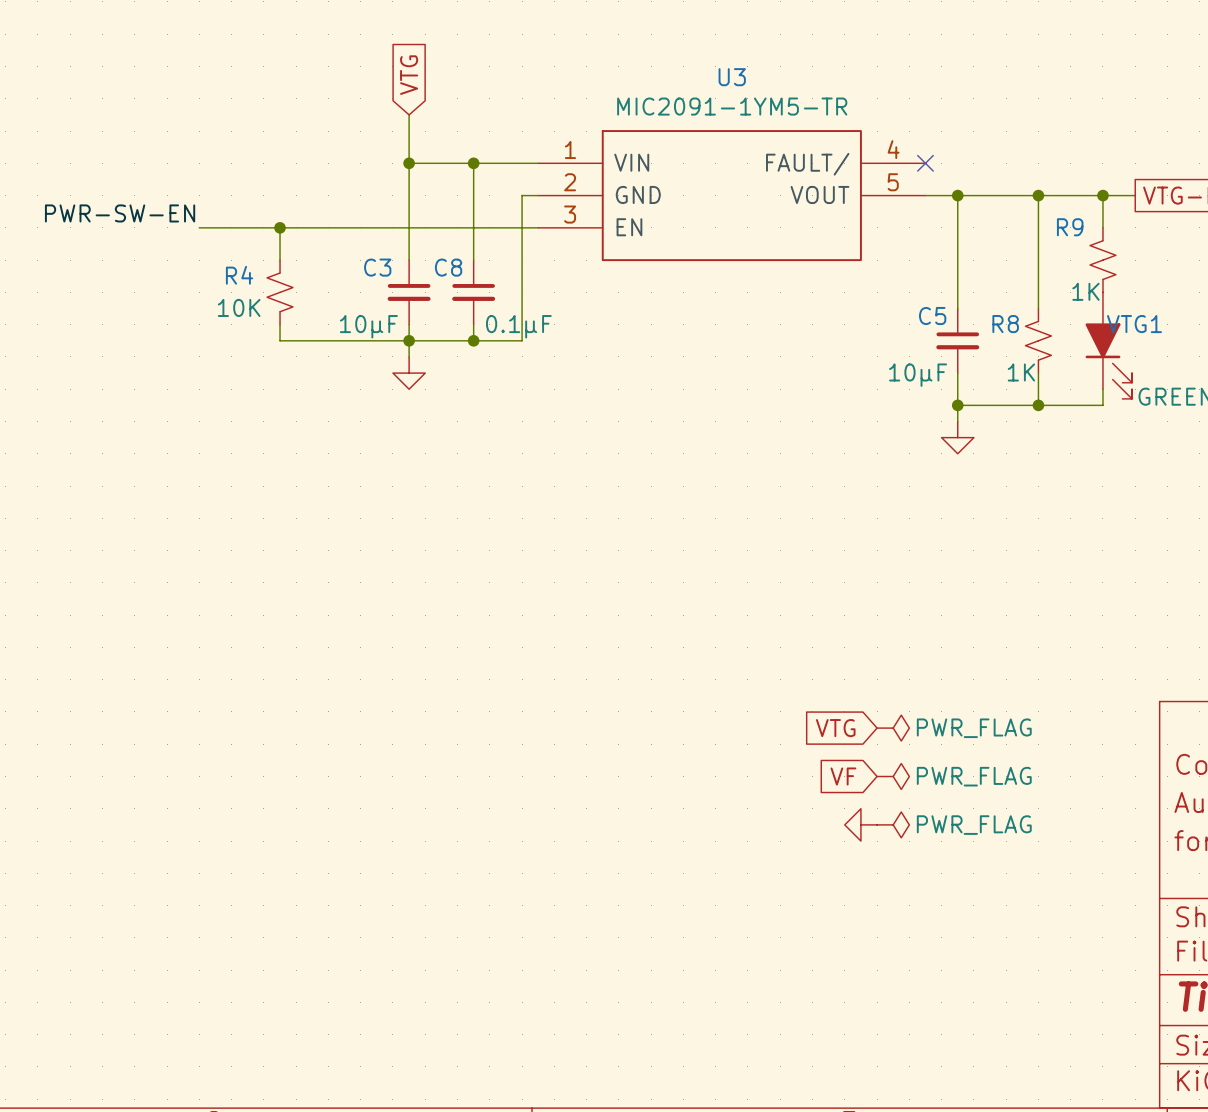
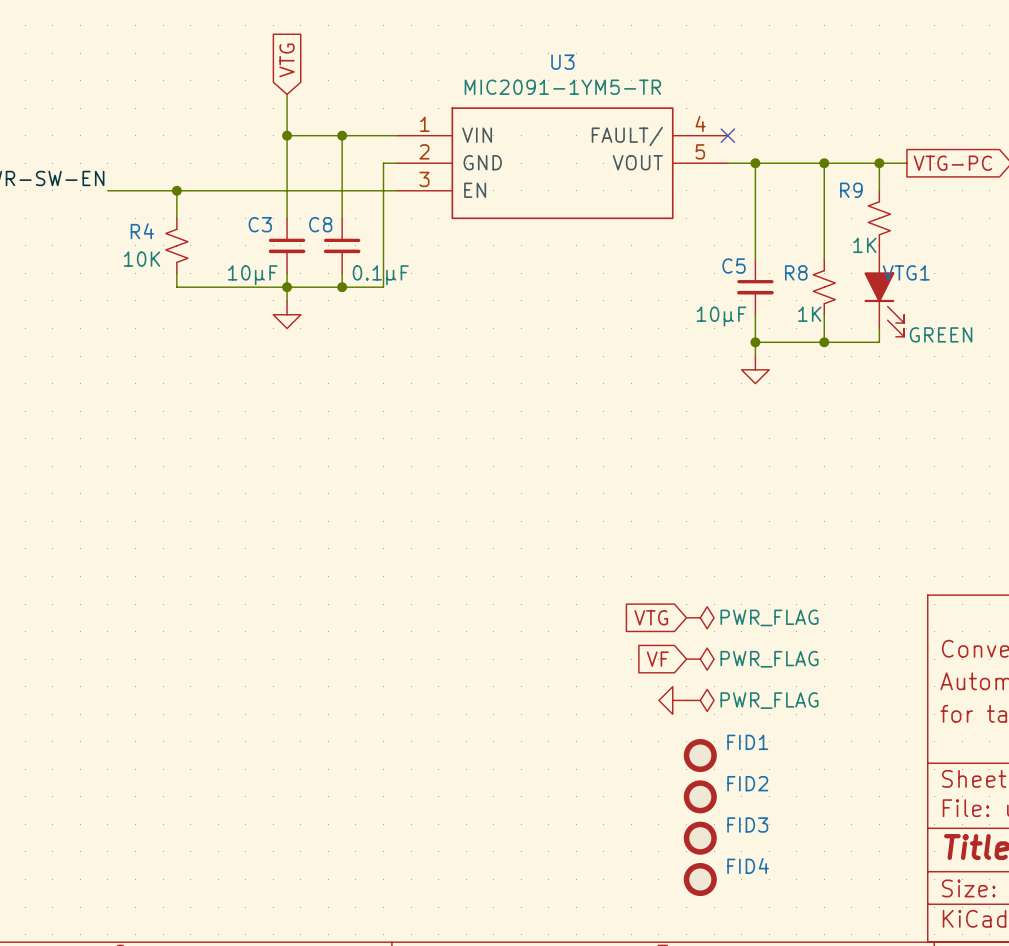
FID1: none -> (700, 755)
FID2: none -> (700, 796)
FID3: none -> (700, 838)
FID4: none -> (700, 879)

